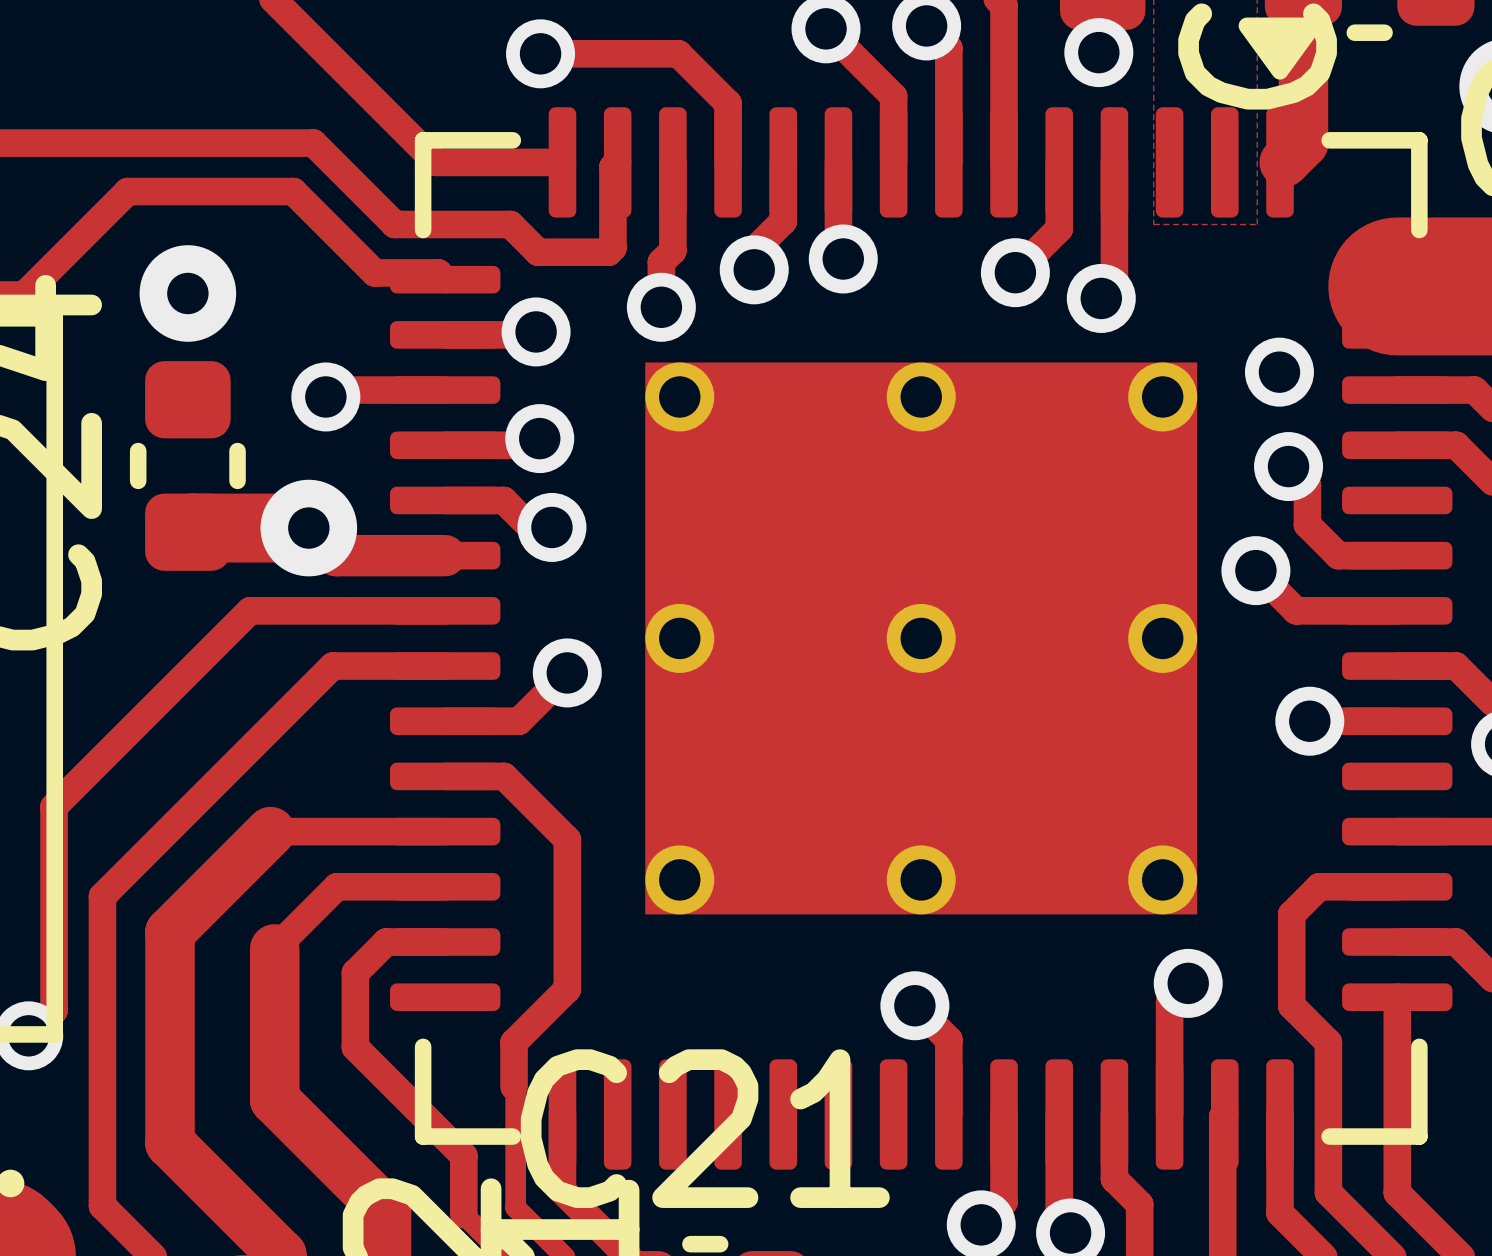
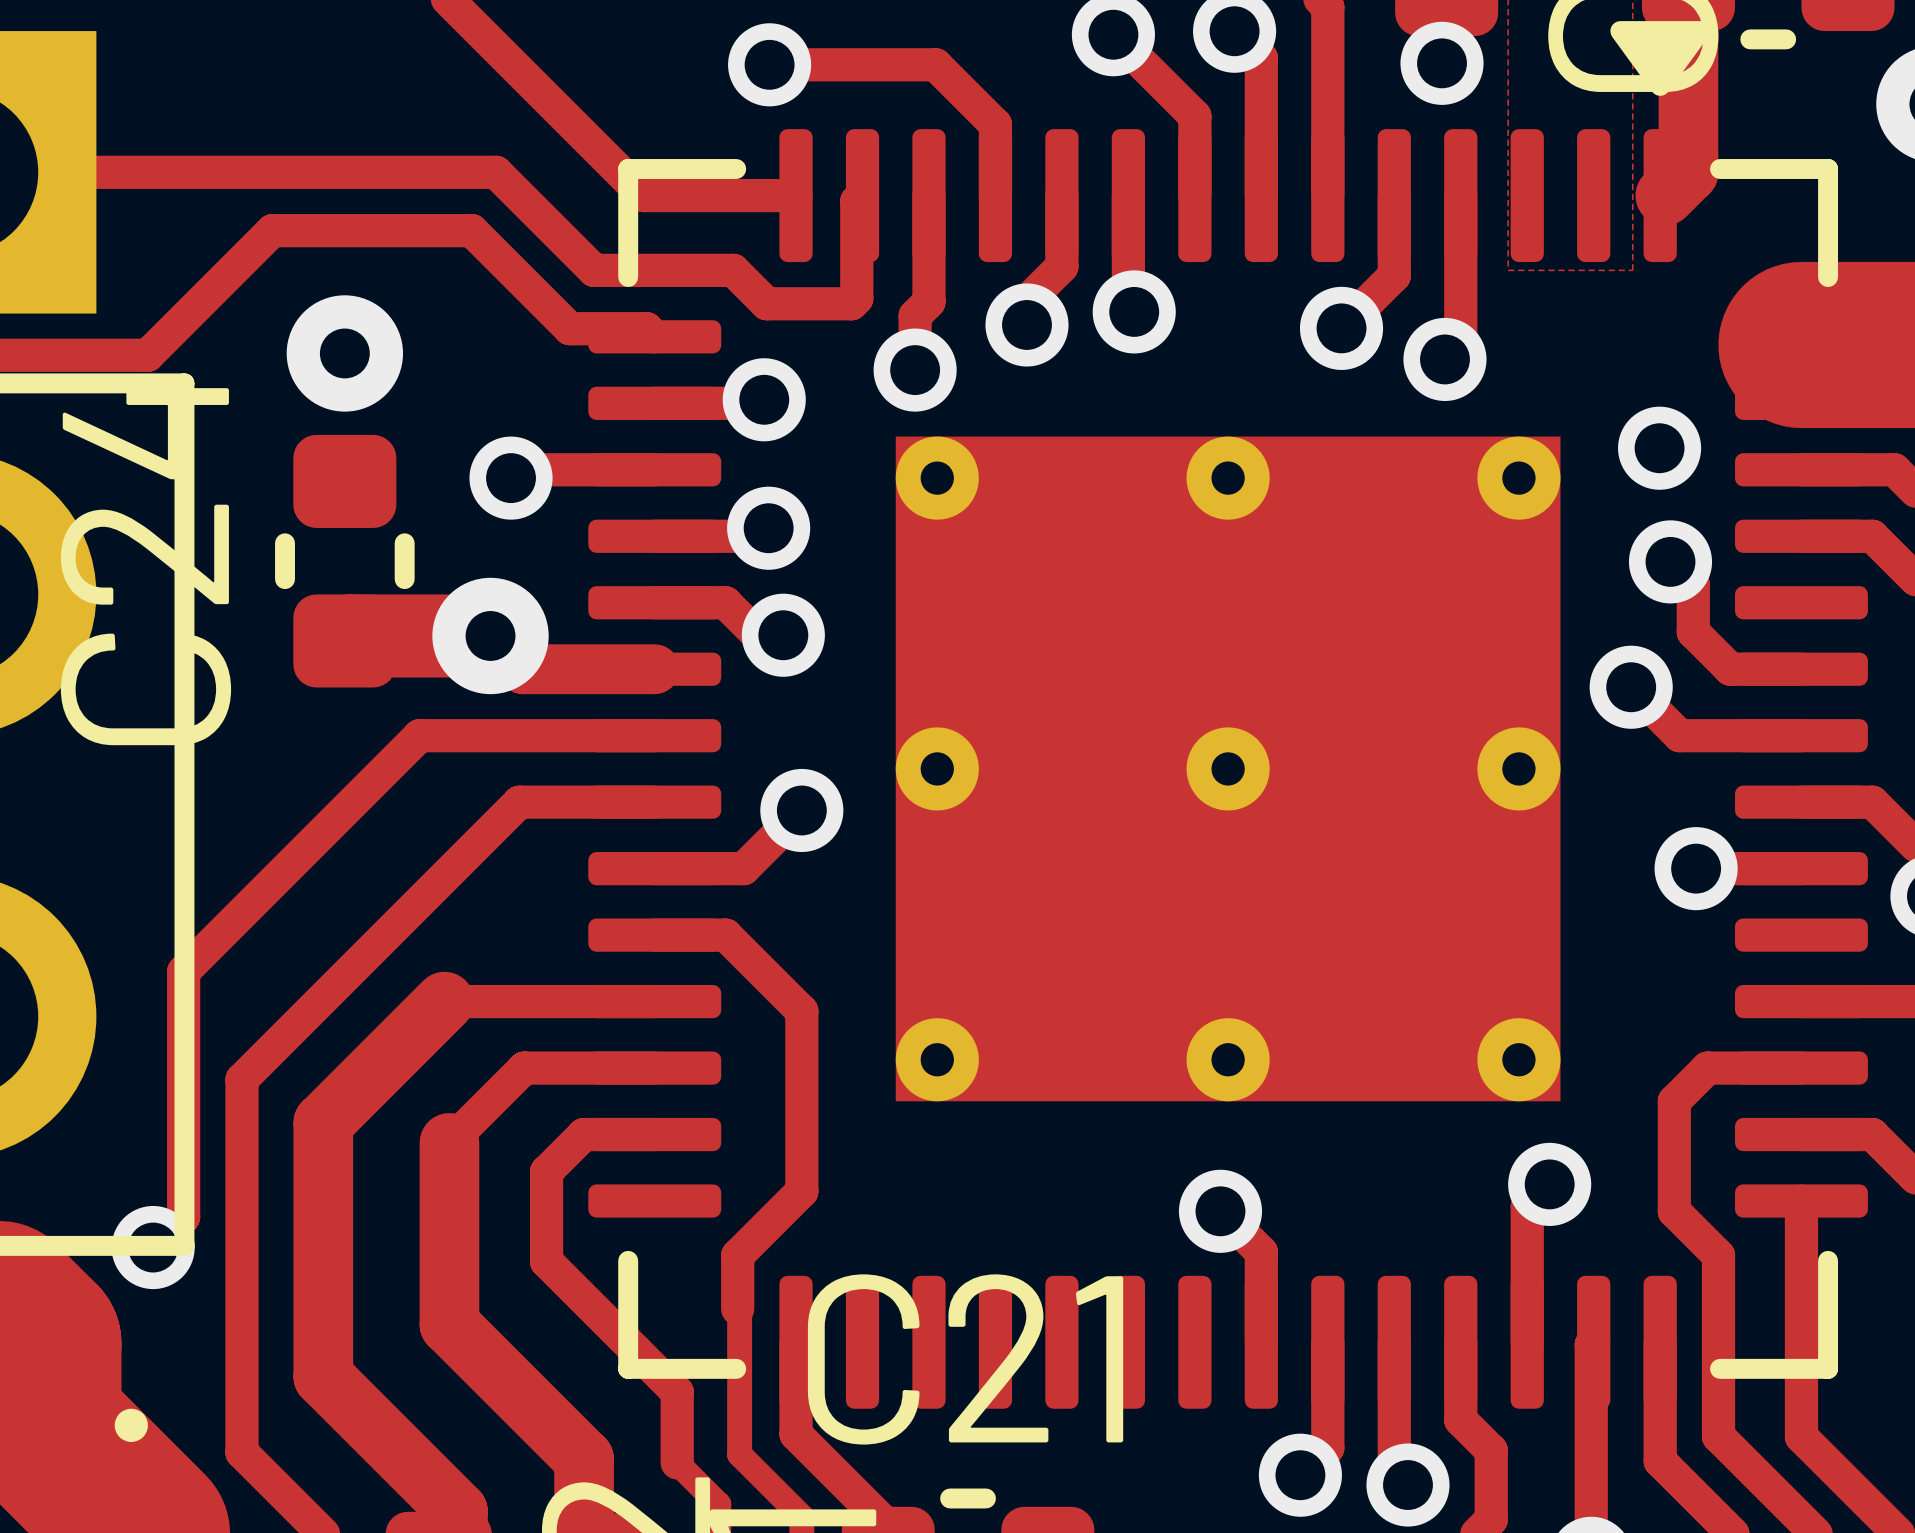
part footprint: [390, 17, 1453, 1170] -> [588, 21, 1868, 1409]

